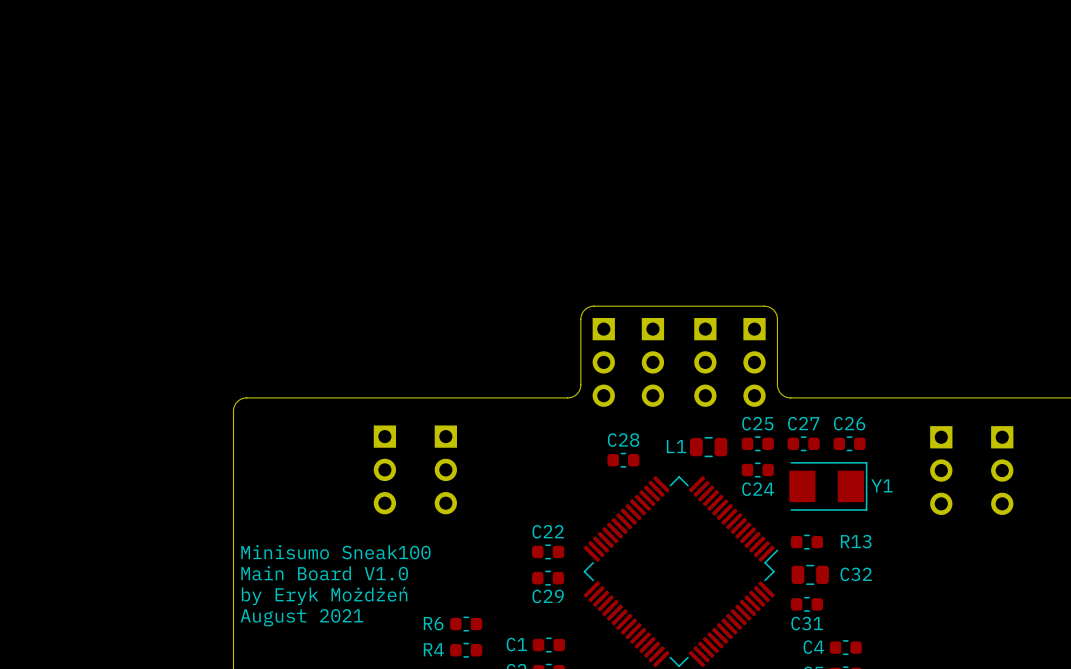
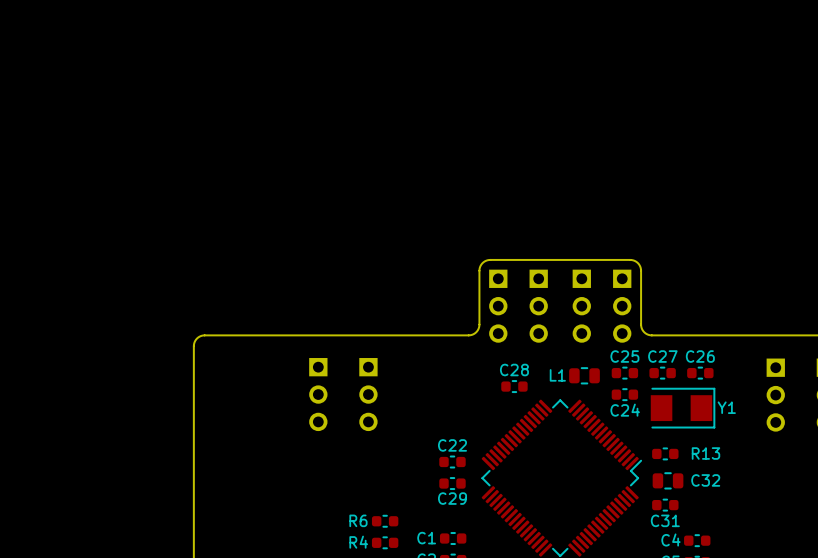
text: Minisumo Sneak100 (335, 552) -> none
text: Main Board V1.0 (324, 573) -> none
text: by Eryk Możdżeń (324, 595) -> none
text: August 2021 (301, 617) -> none

